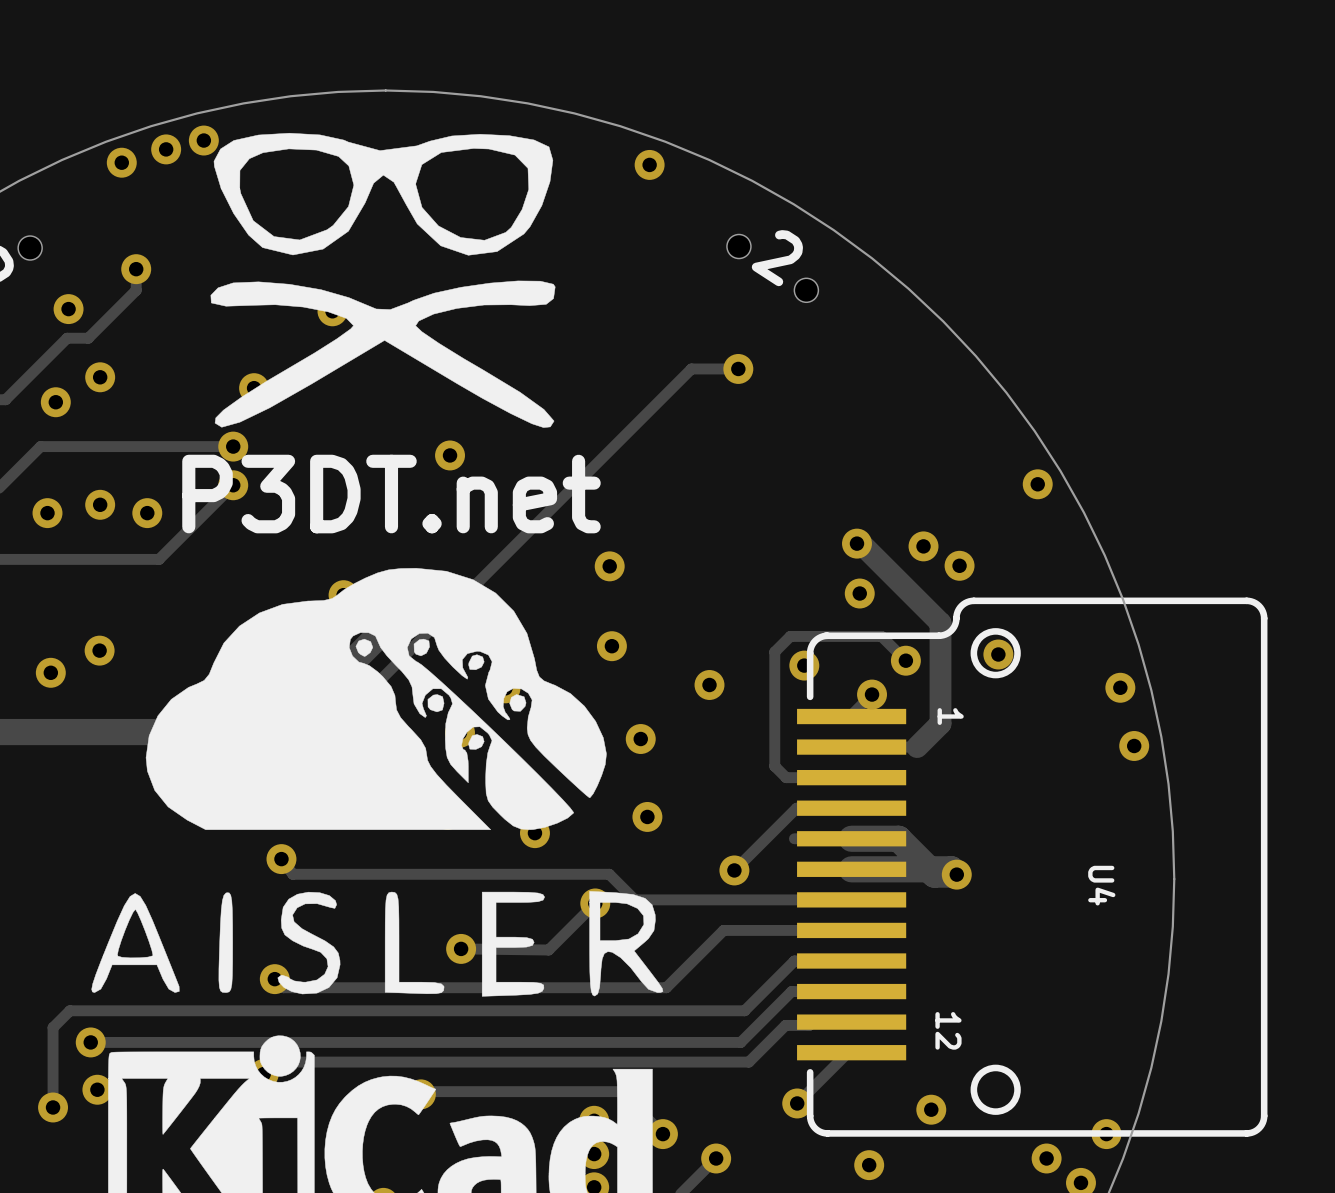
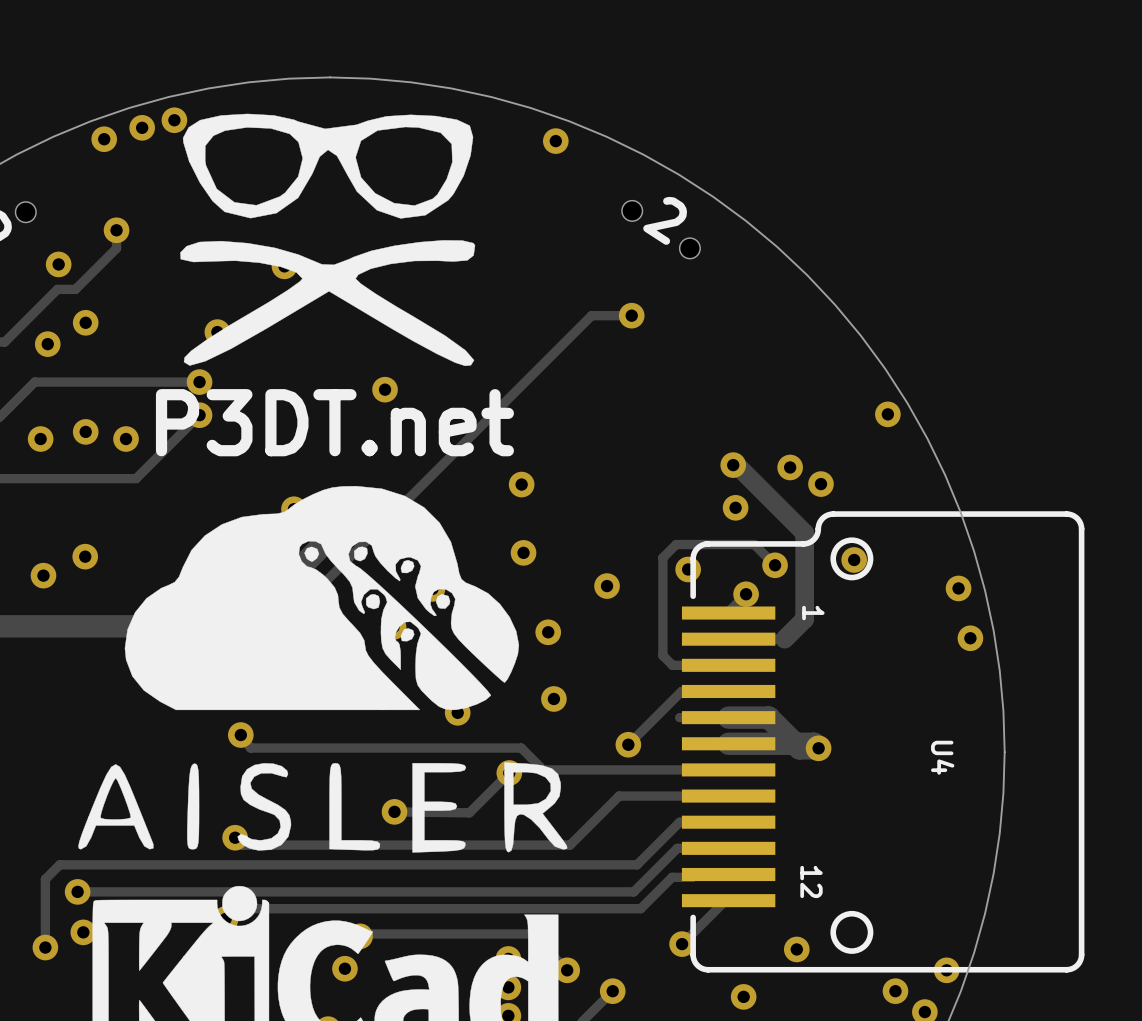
via: none -> (344, 968)

